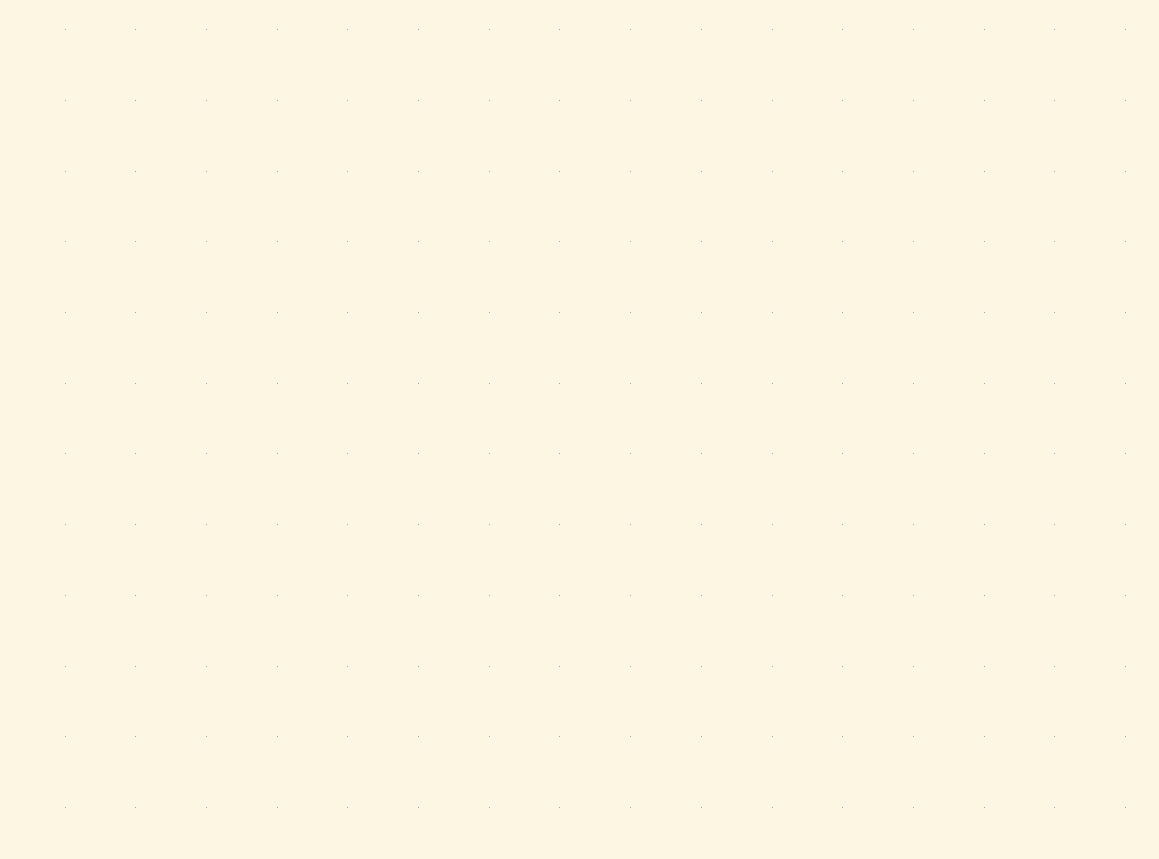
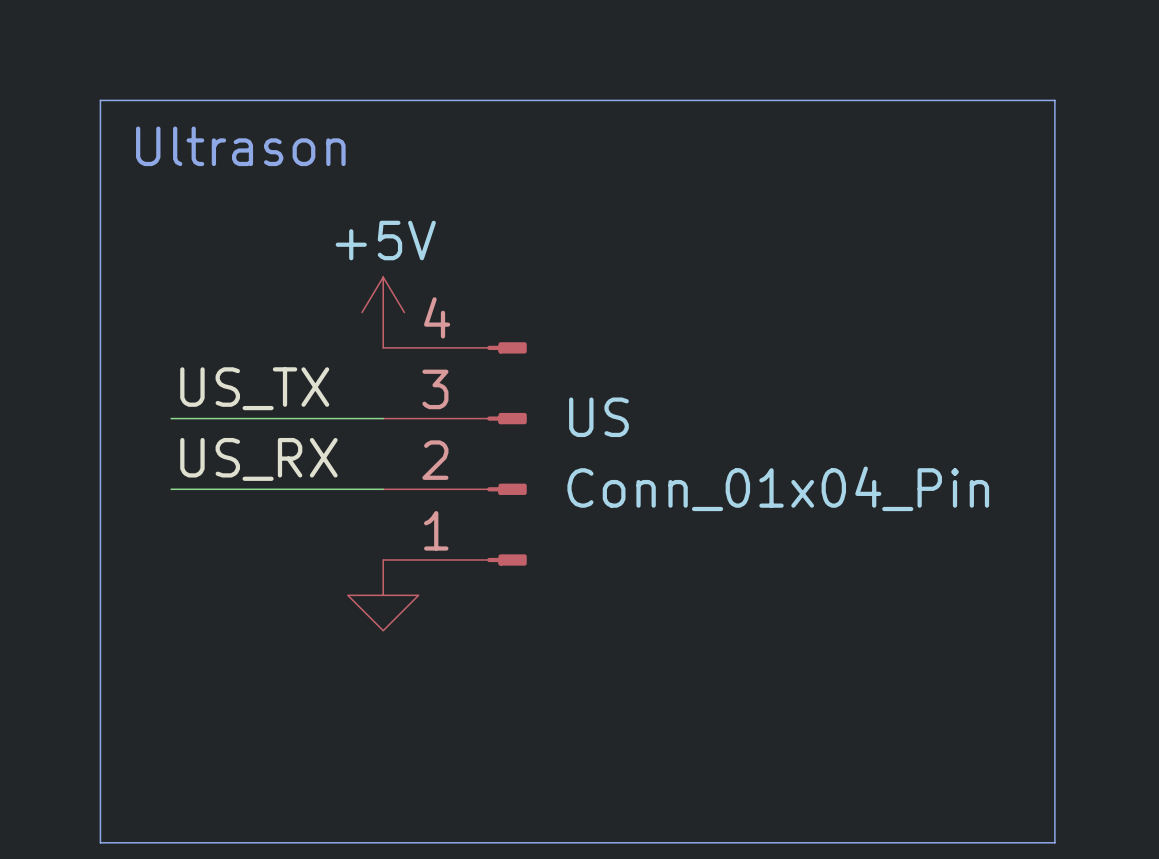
line: none -> (100, 100) (1054, 100) (1054, 842) (100, 842) (100, 100)
text: none -> Ultrason (240, 146)
power symbol: none -> +5V (383, 312)
label: none -> US_TX (254, 388)
wire: none -> (171, 418) (383, 418)
US: none -> Conn_01x04_Pin (455, 453)
label: none -> US_RX (258, 459)
wire: none -> (171, 489) (383, 489)
power symbol: none -> (383, 595)

